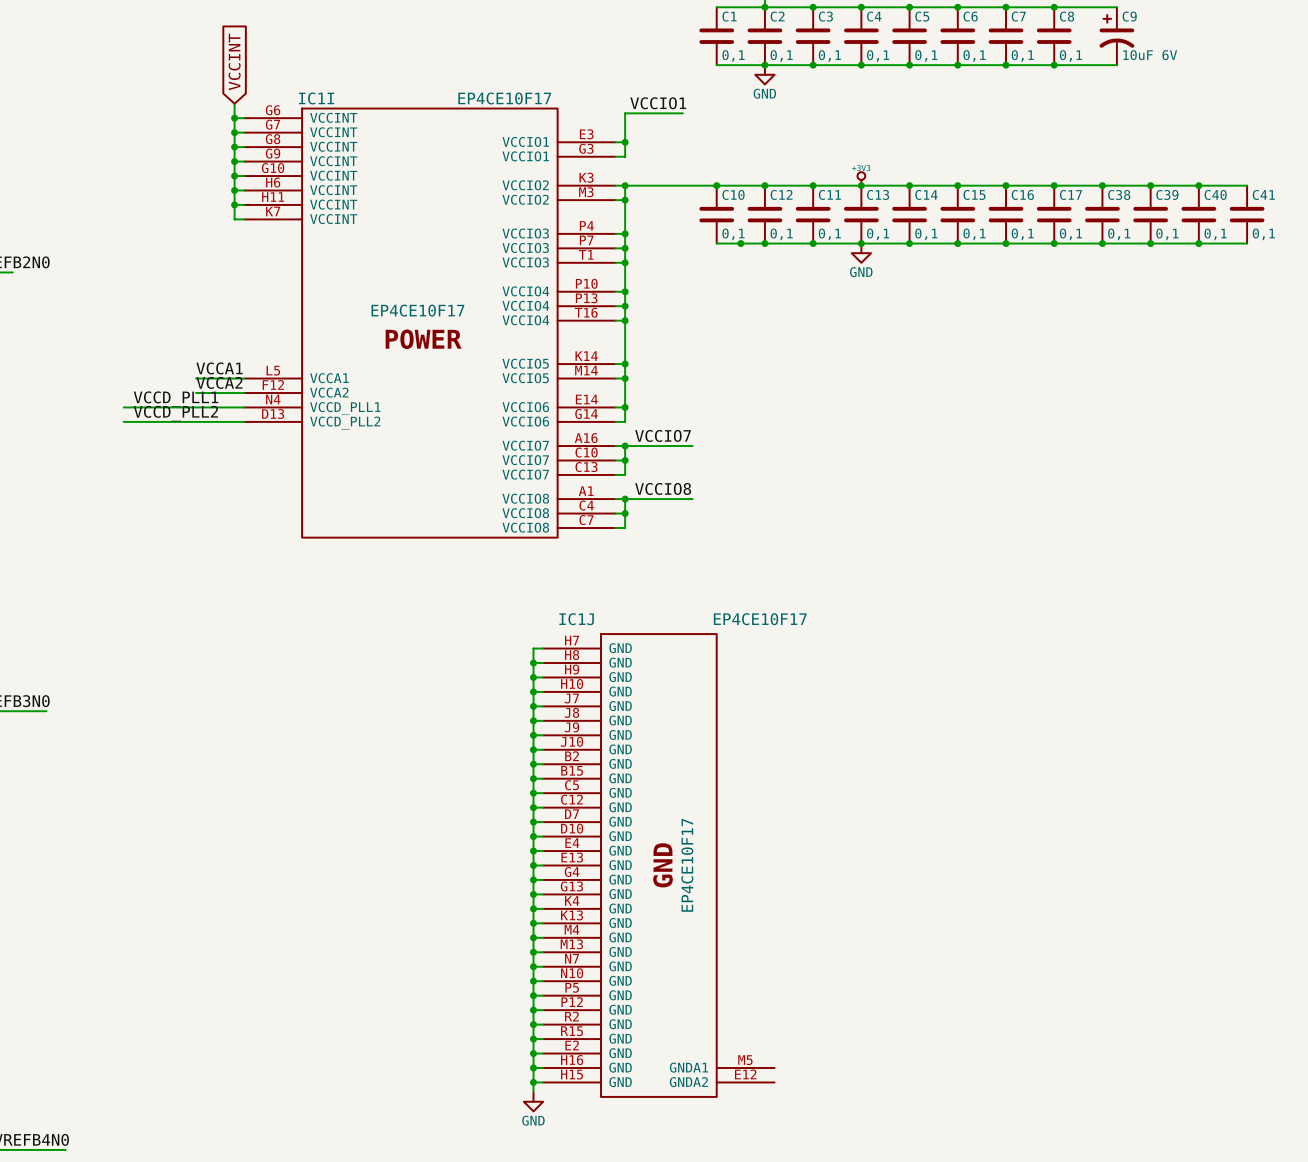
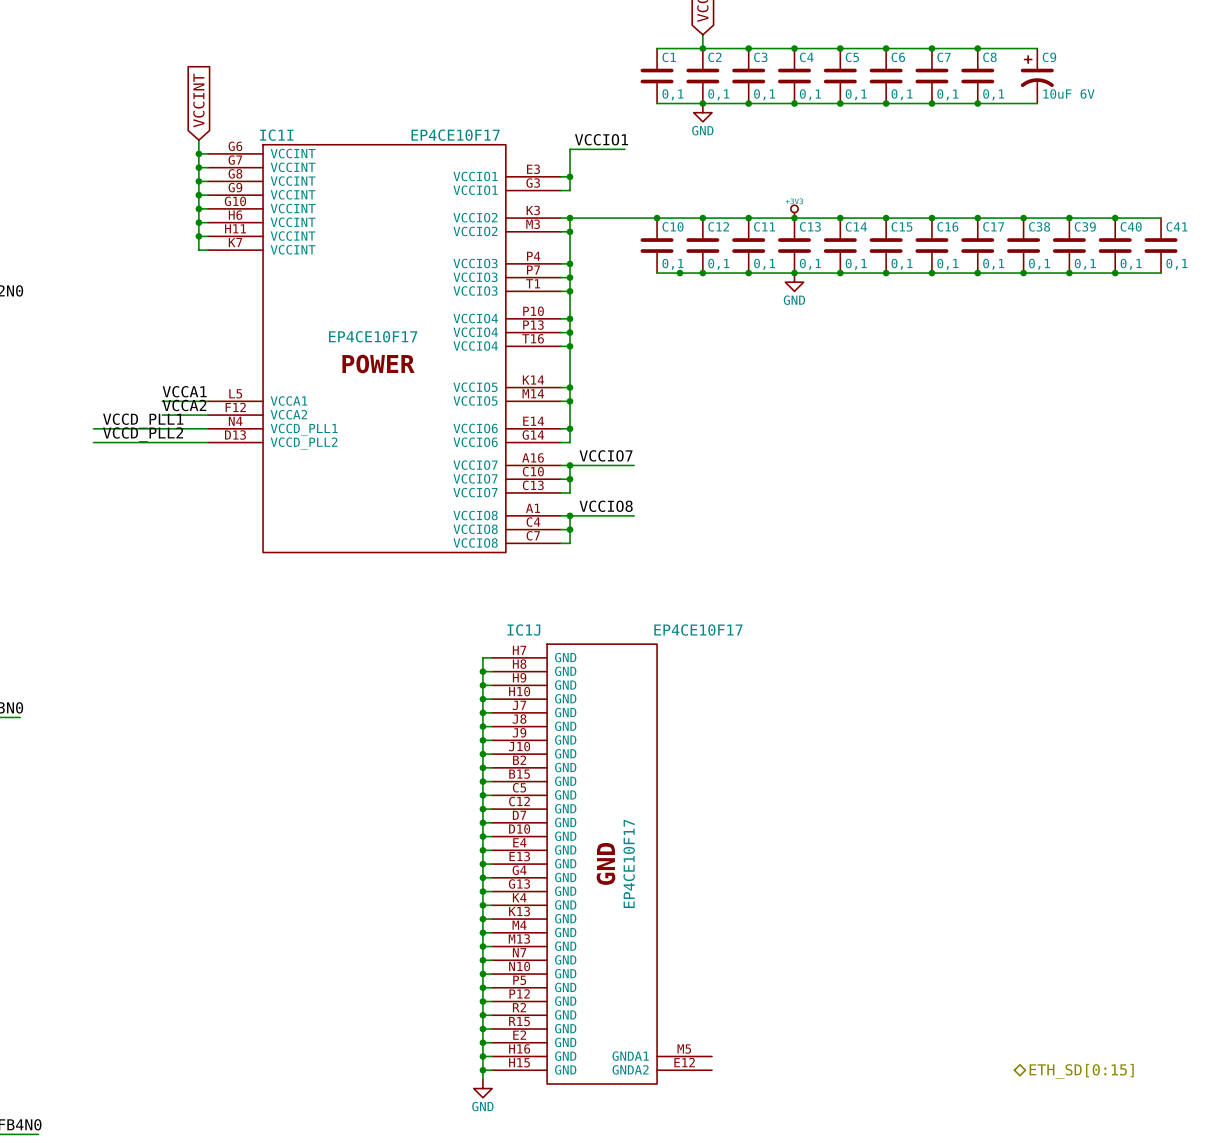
hierarchical label: none -> ETH_SD[0:15] (1081, 1071)

